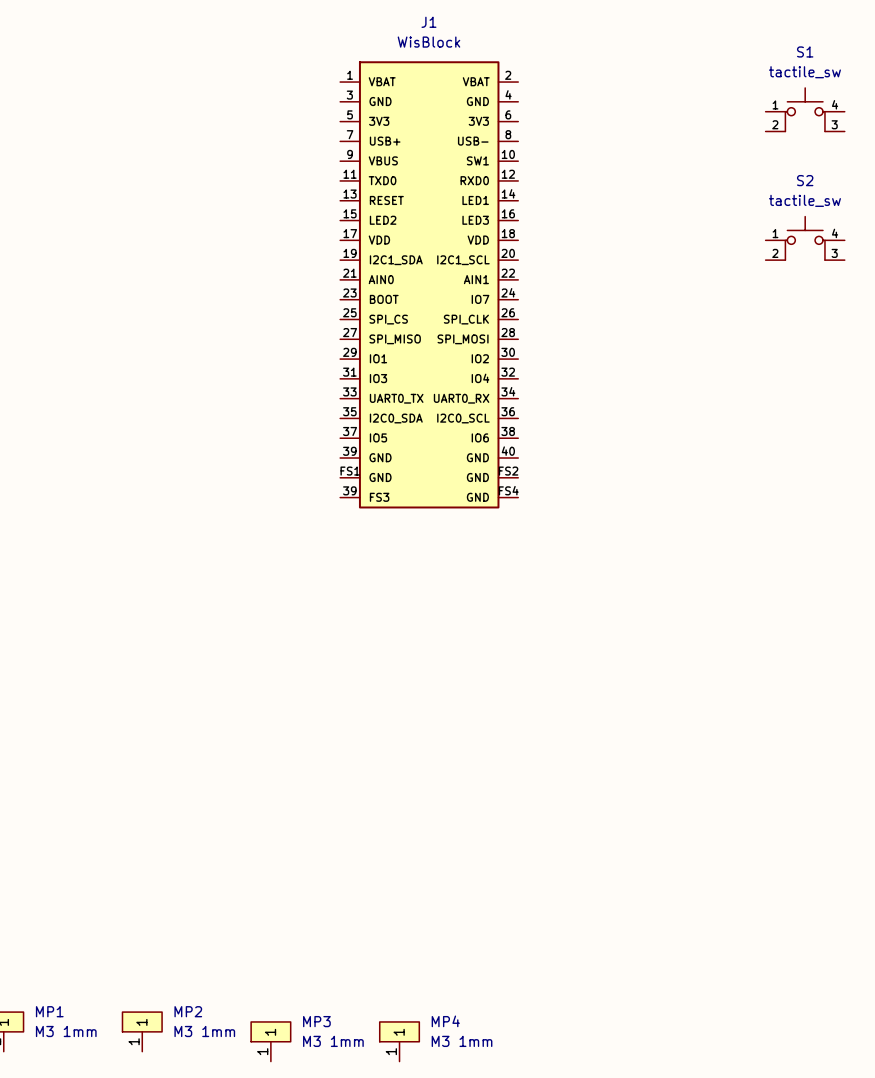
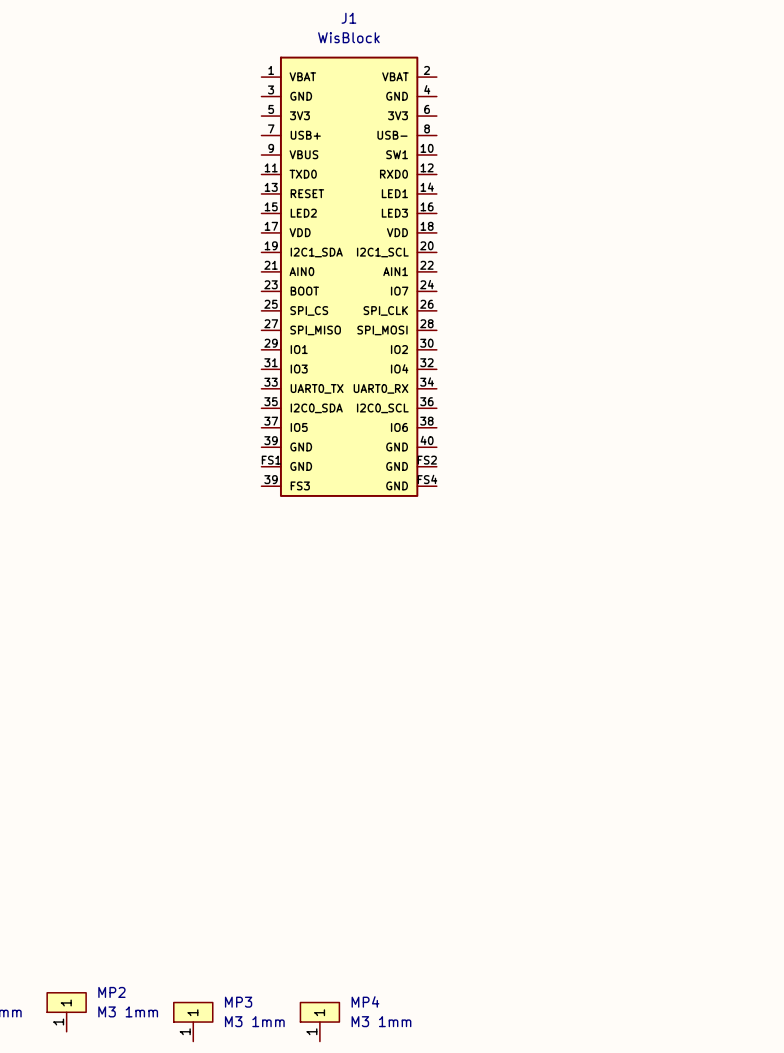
S1: tactile_sw (805, 109) -> none
S2: tactile_sw (805, 238) -> none

